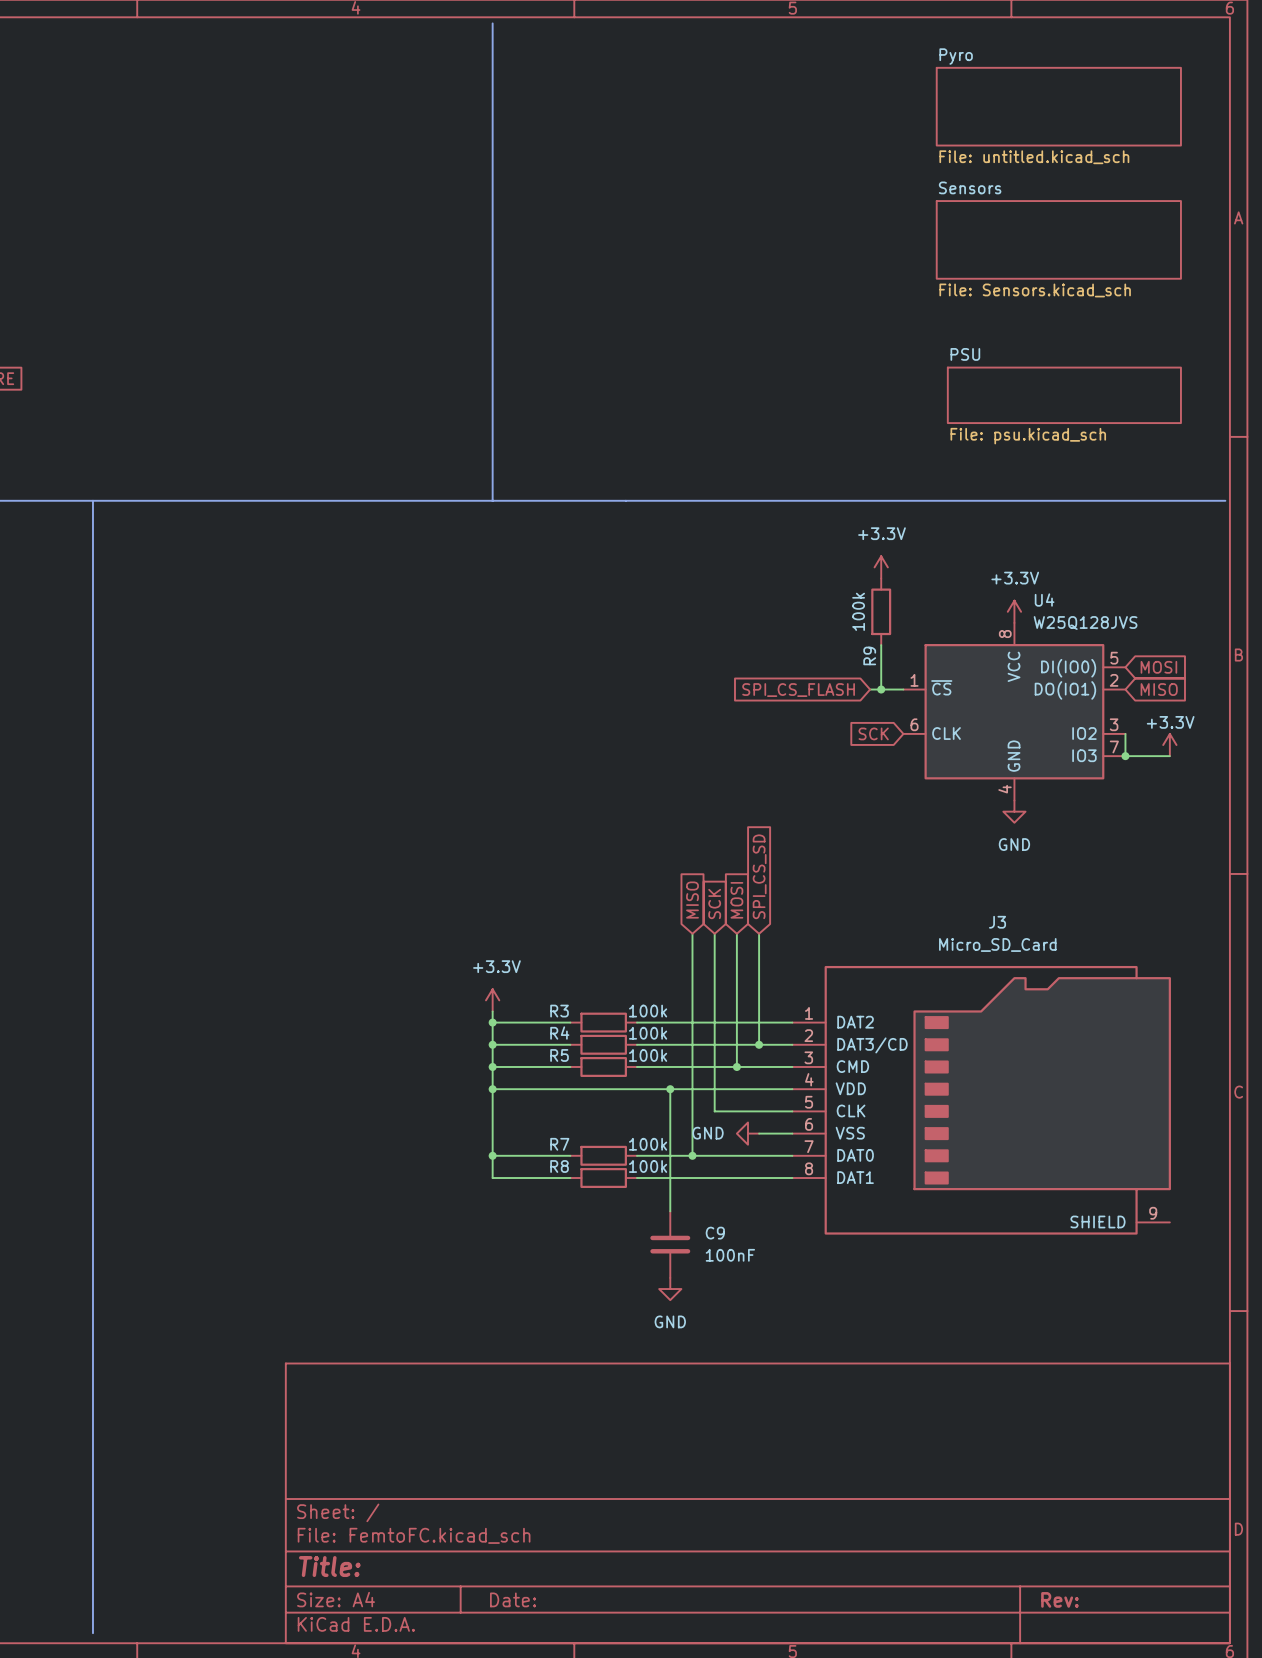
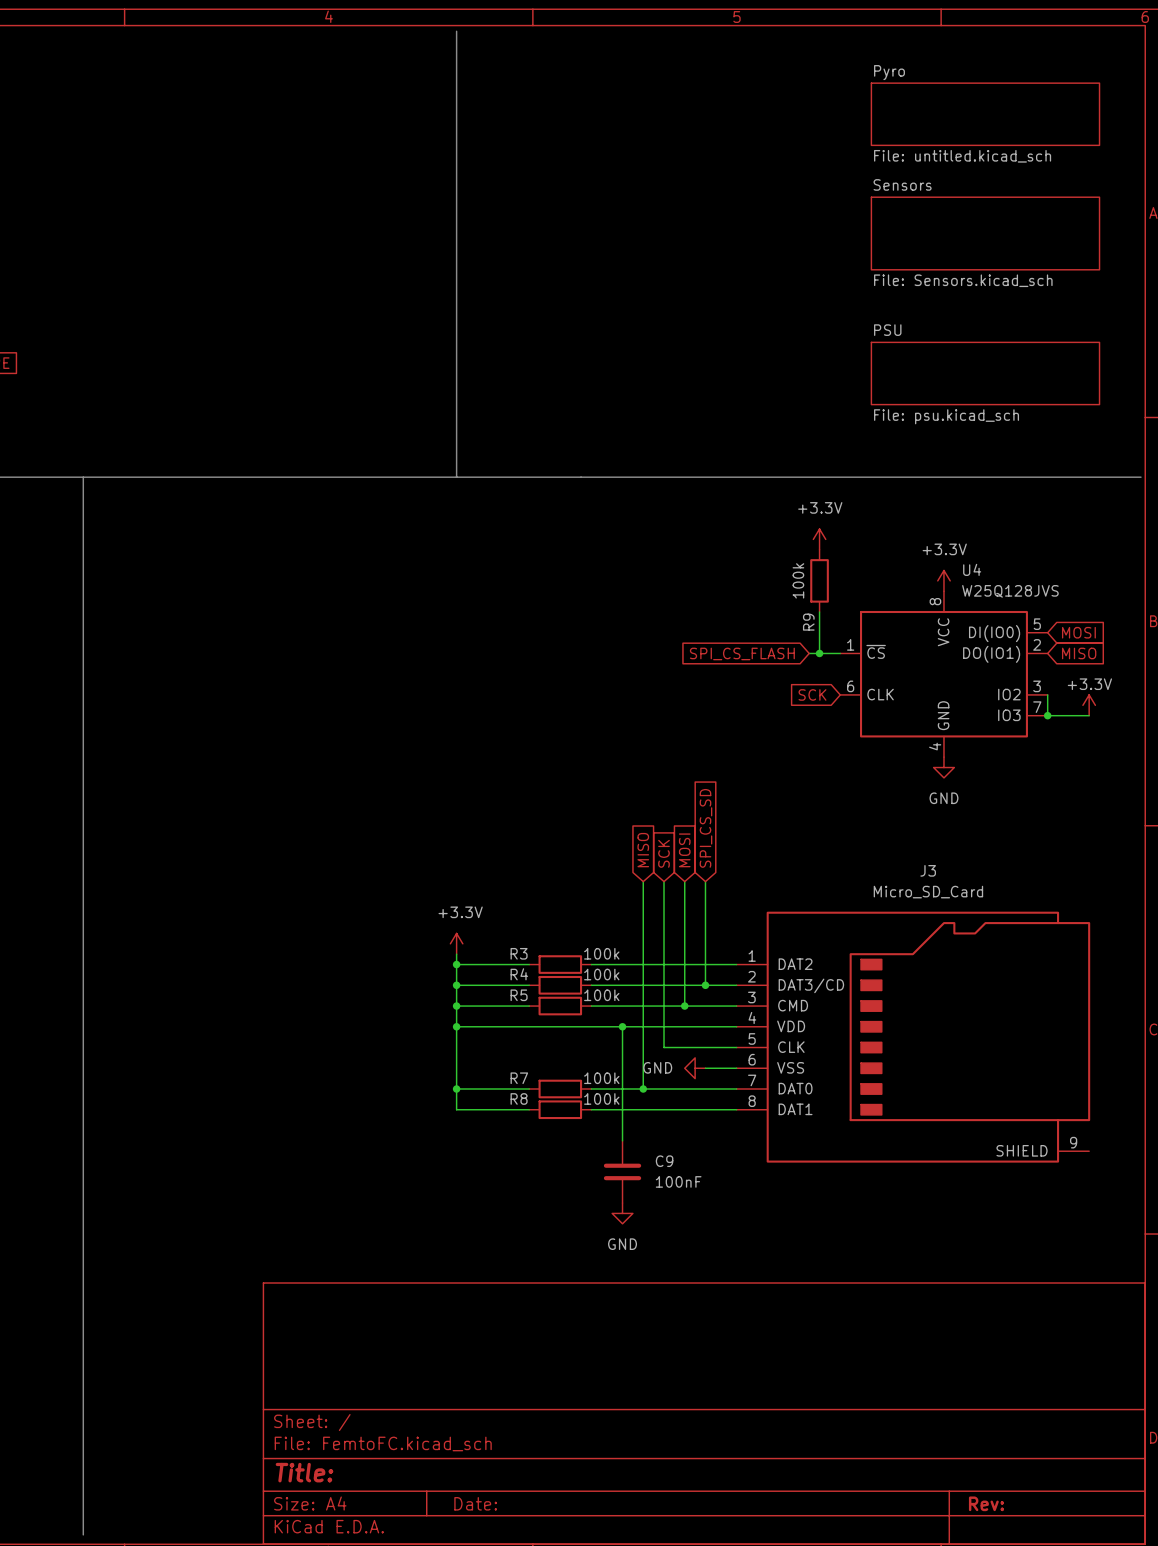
sheet Pyro shape: [936, 67, 1182, 147] -> [870, 82, 1101, 146]
sheet PSU shape: [947, 366, 1182, 424] -> [870, 341, 1101, 406]

